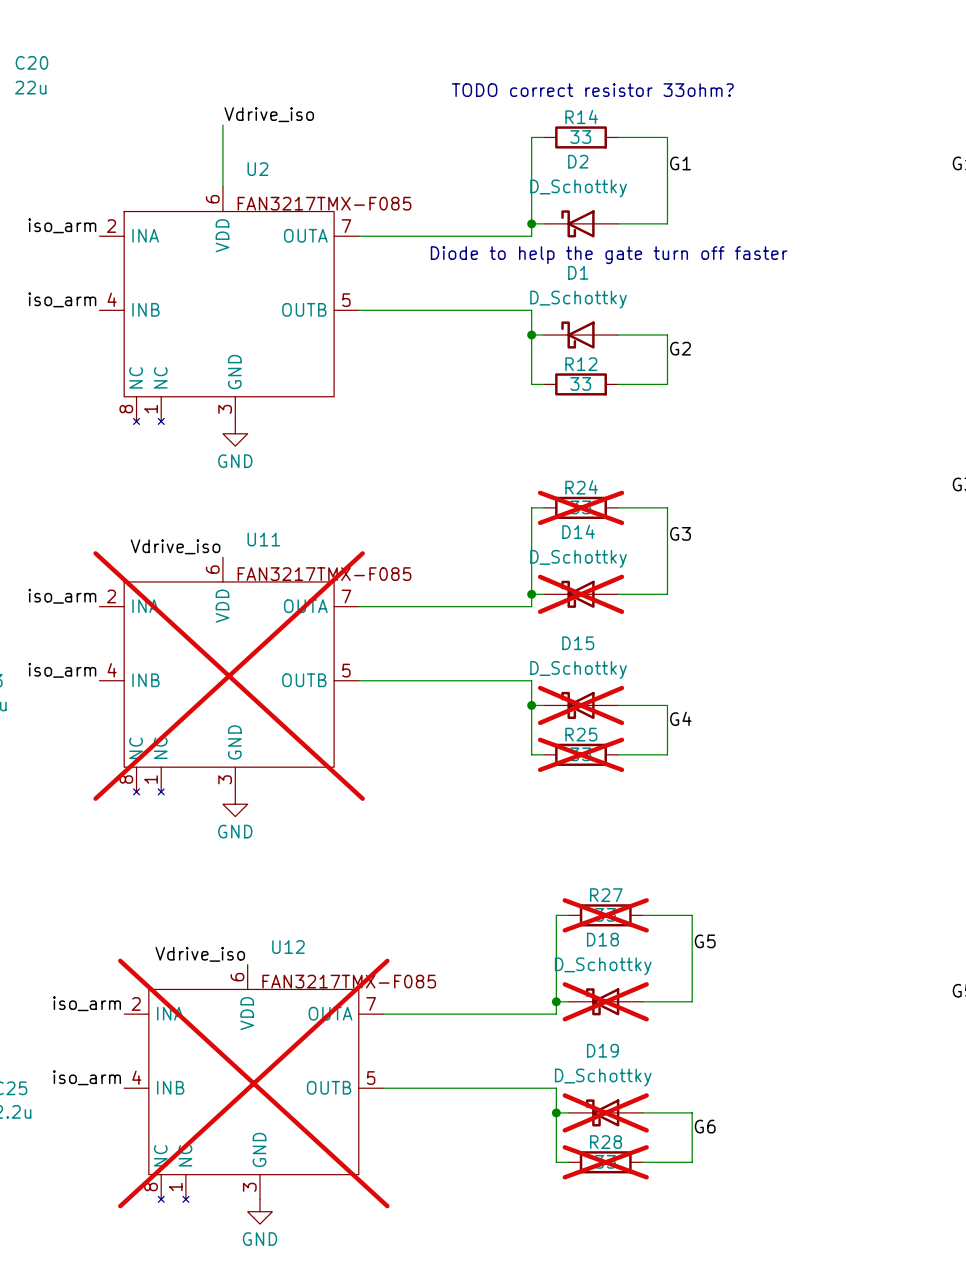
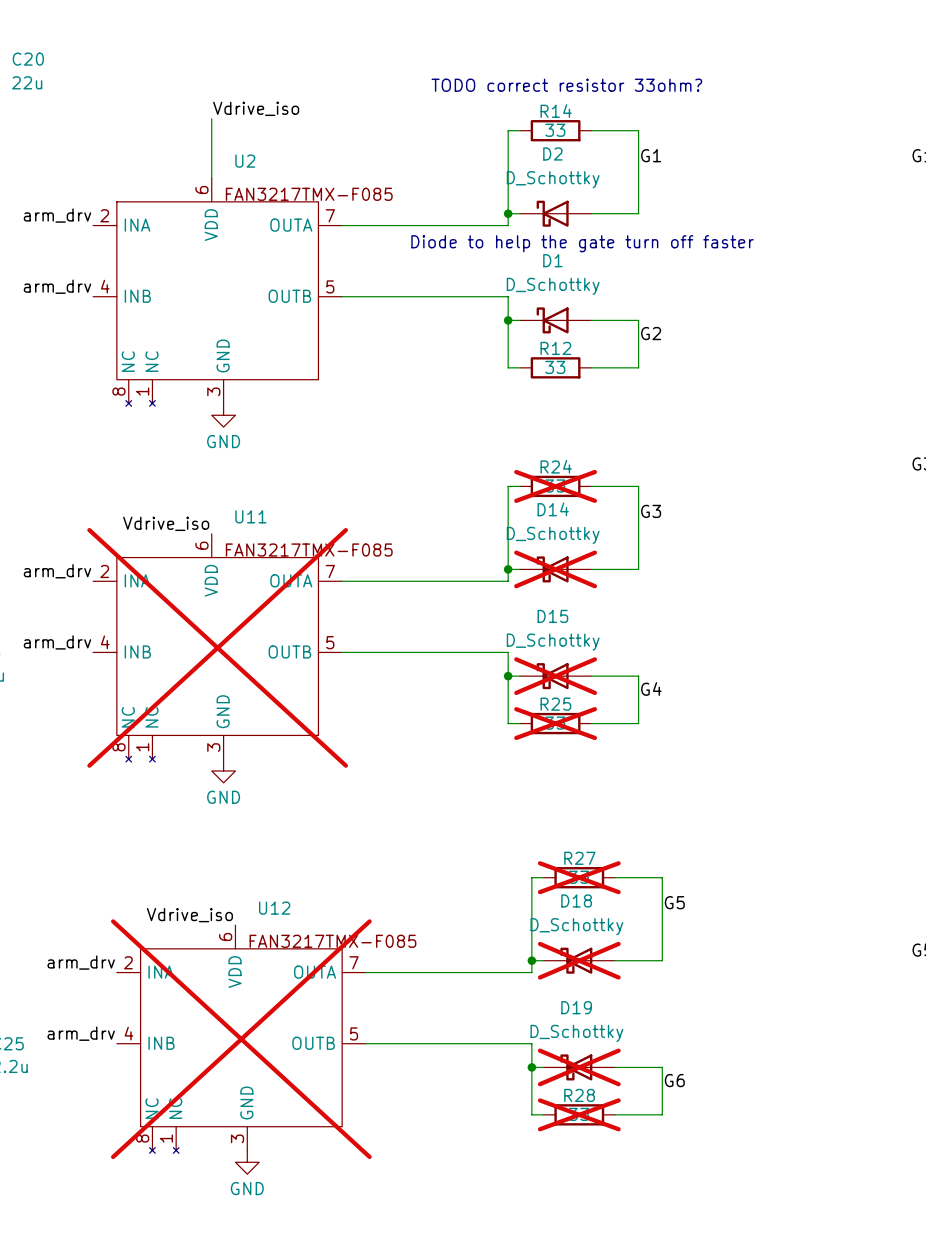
label: iso_arm (62, 225) -> arm_drv (57, 215)
label: iso_arm (62, 299) -> arm_drv (57, 286)
label: iso_arm (62, 596) -> arm_drv (57, 571)
label: iso_arm (62, 670) -> arm_drv (57, 642)
label: iso_arm (87, 1003) -> arm_drv (81, 962)
label: iso_arm (87, 1077) -> arm_drv (81, 1033)

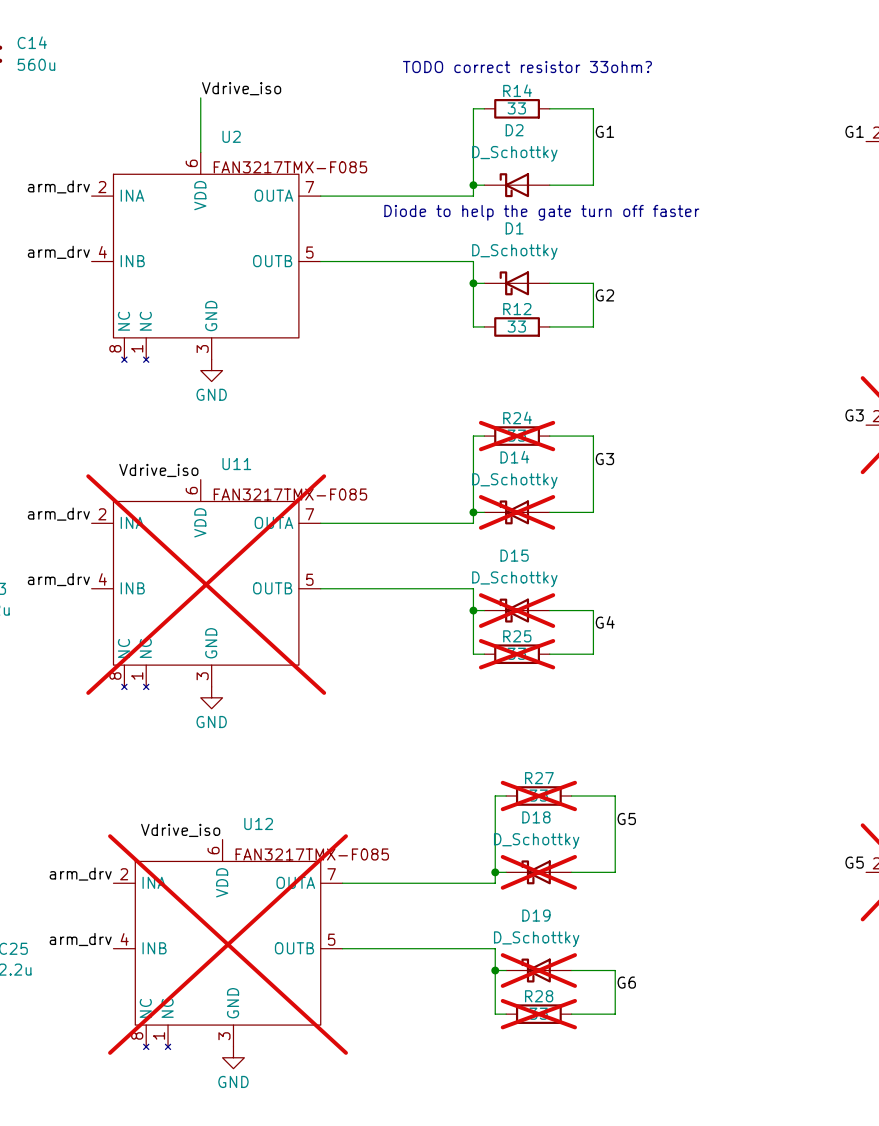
C20 name: C20 (28, 59) -> C14 (32, 42)
C20 value: 22u (27, 82) -> 560u (36, 64)

